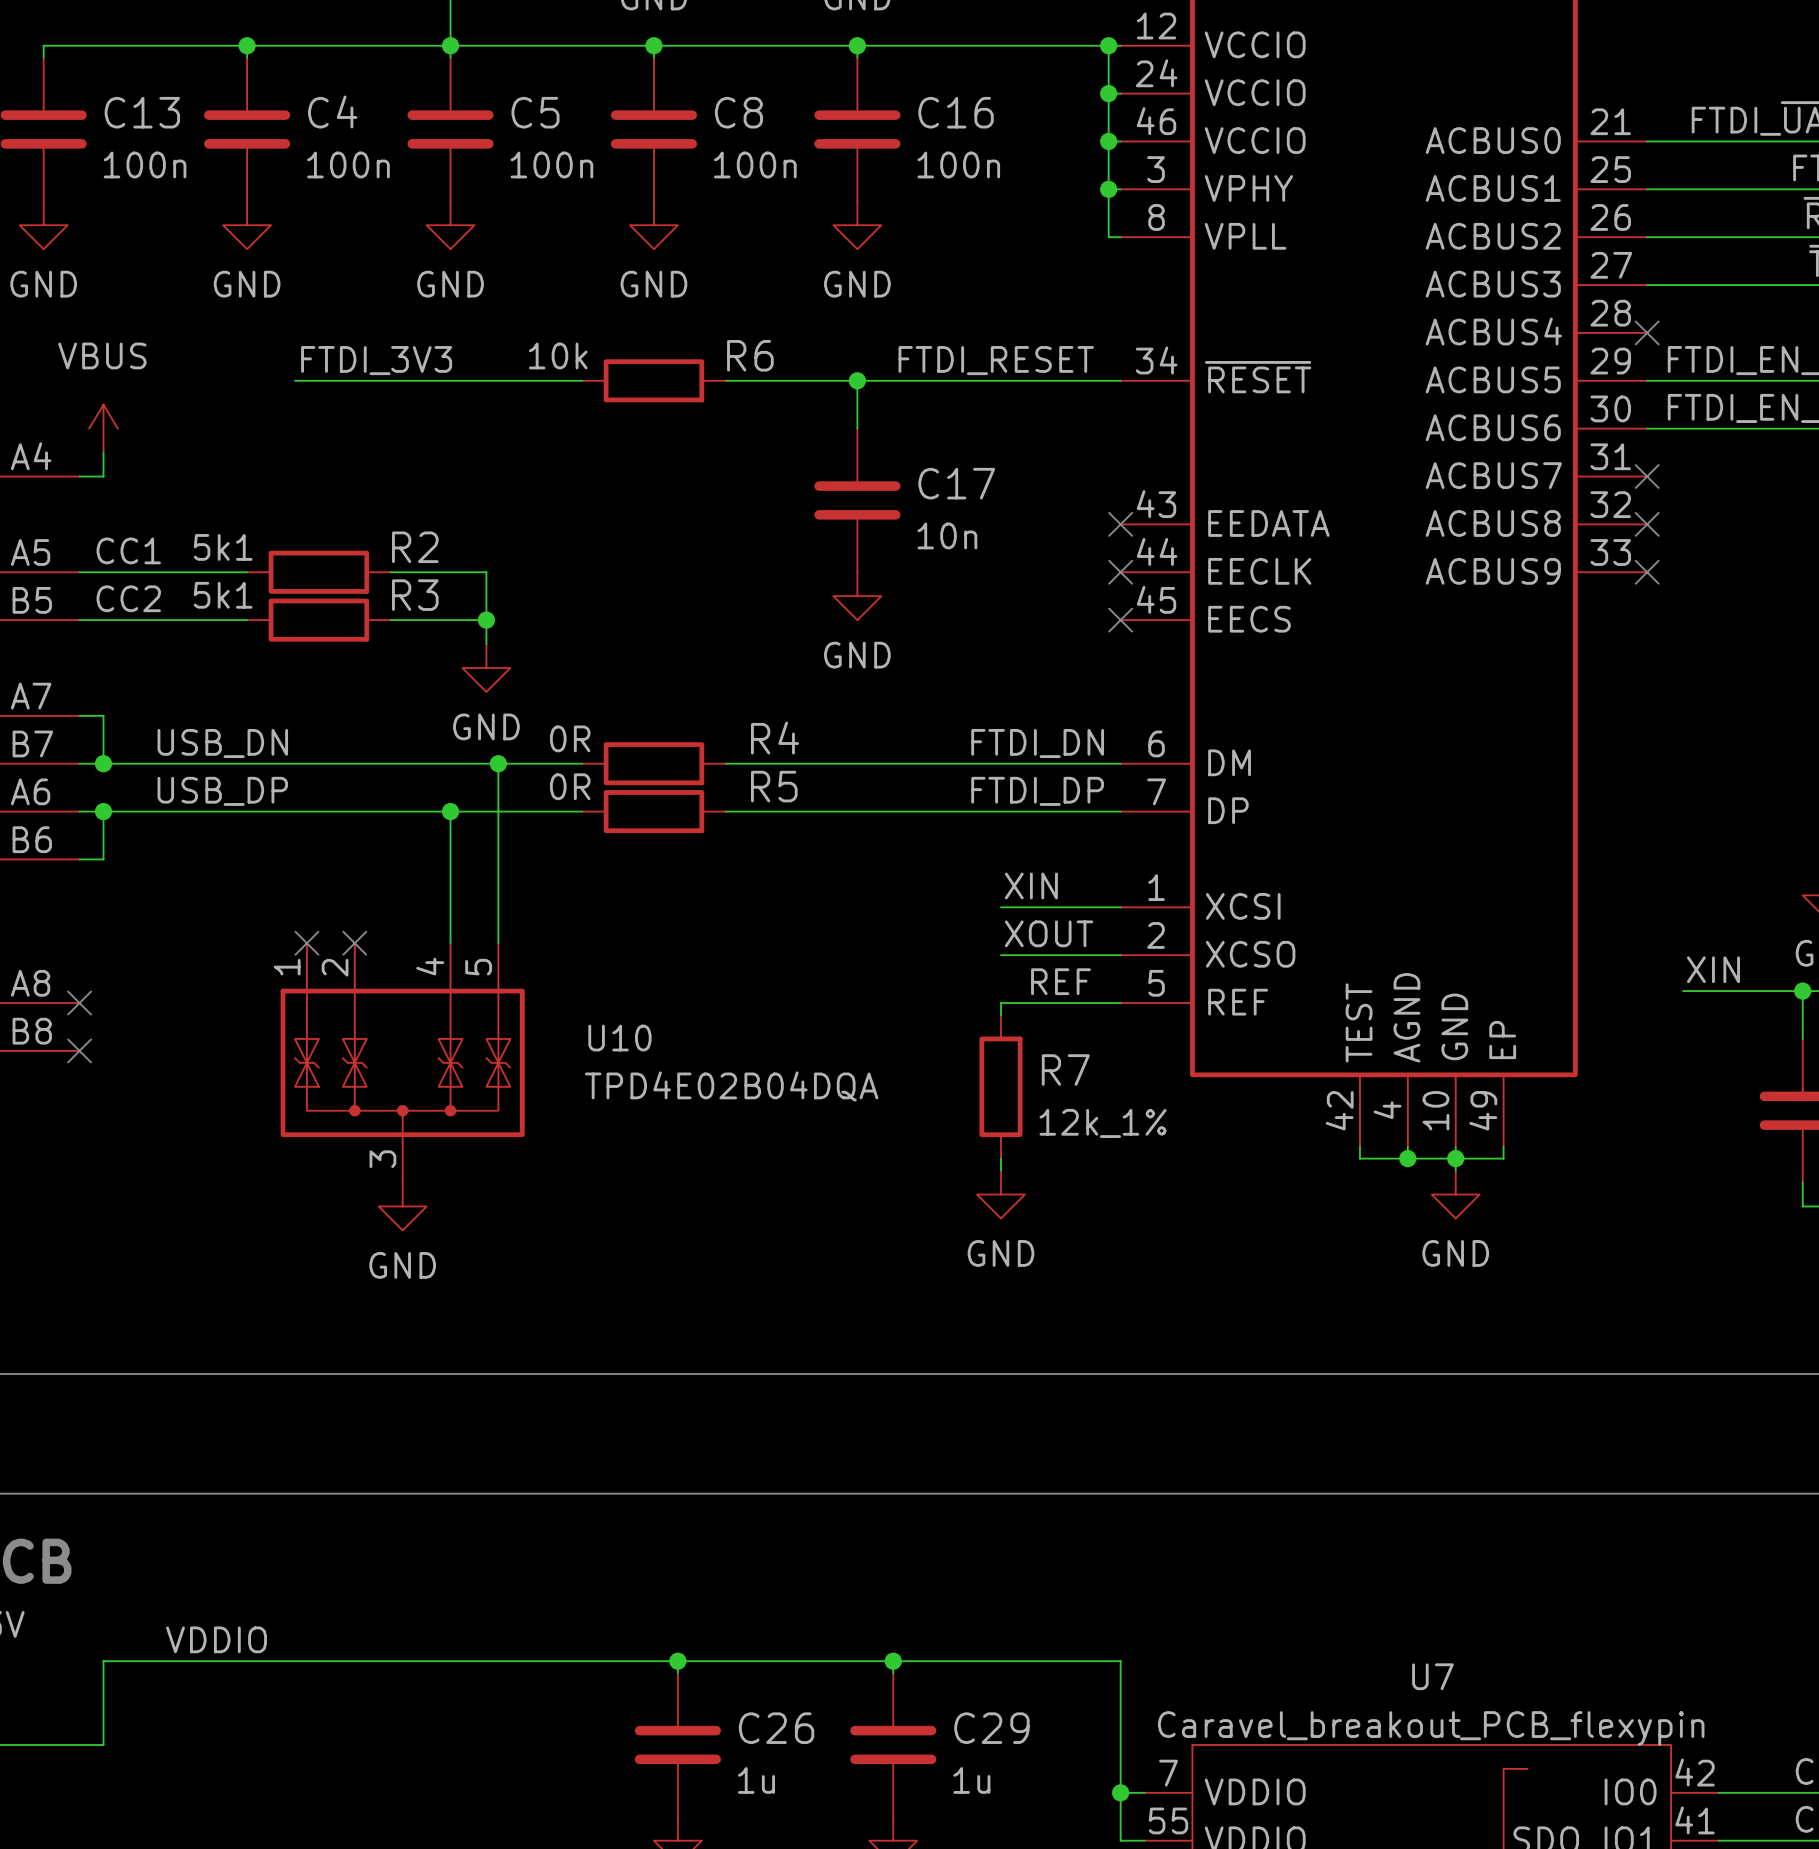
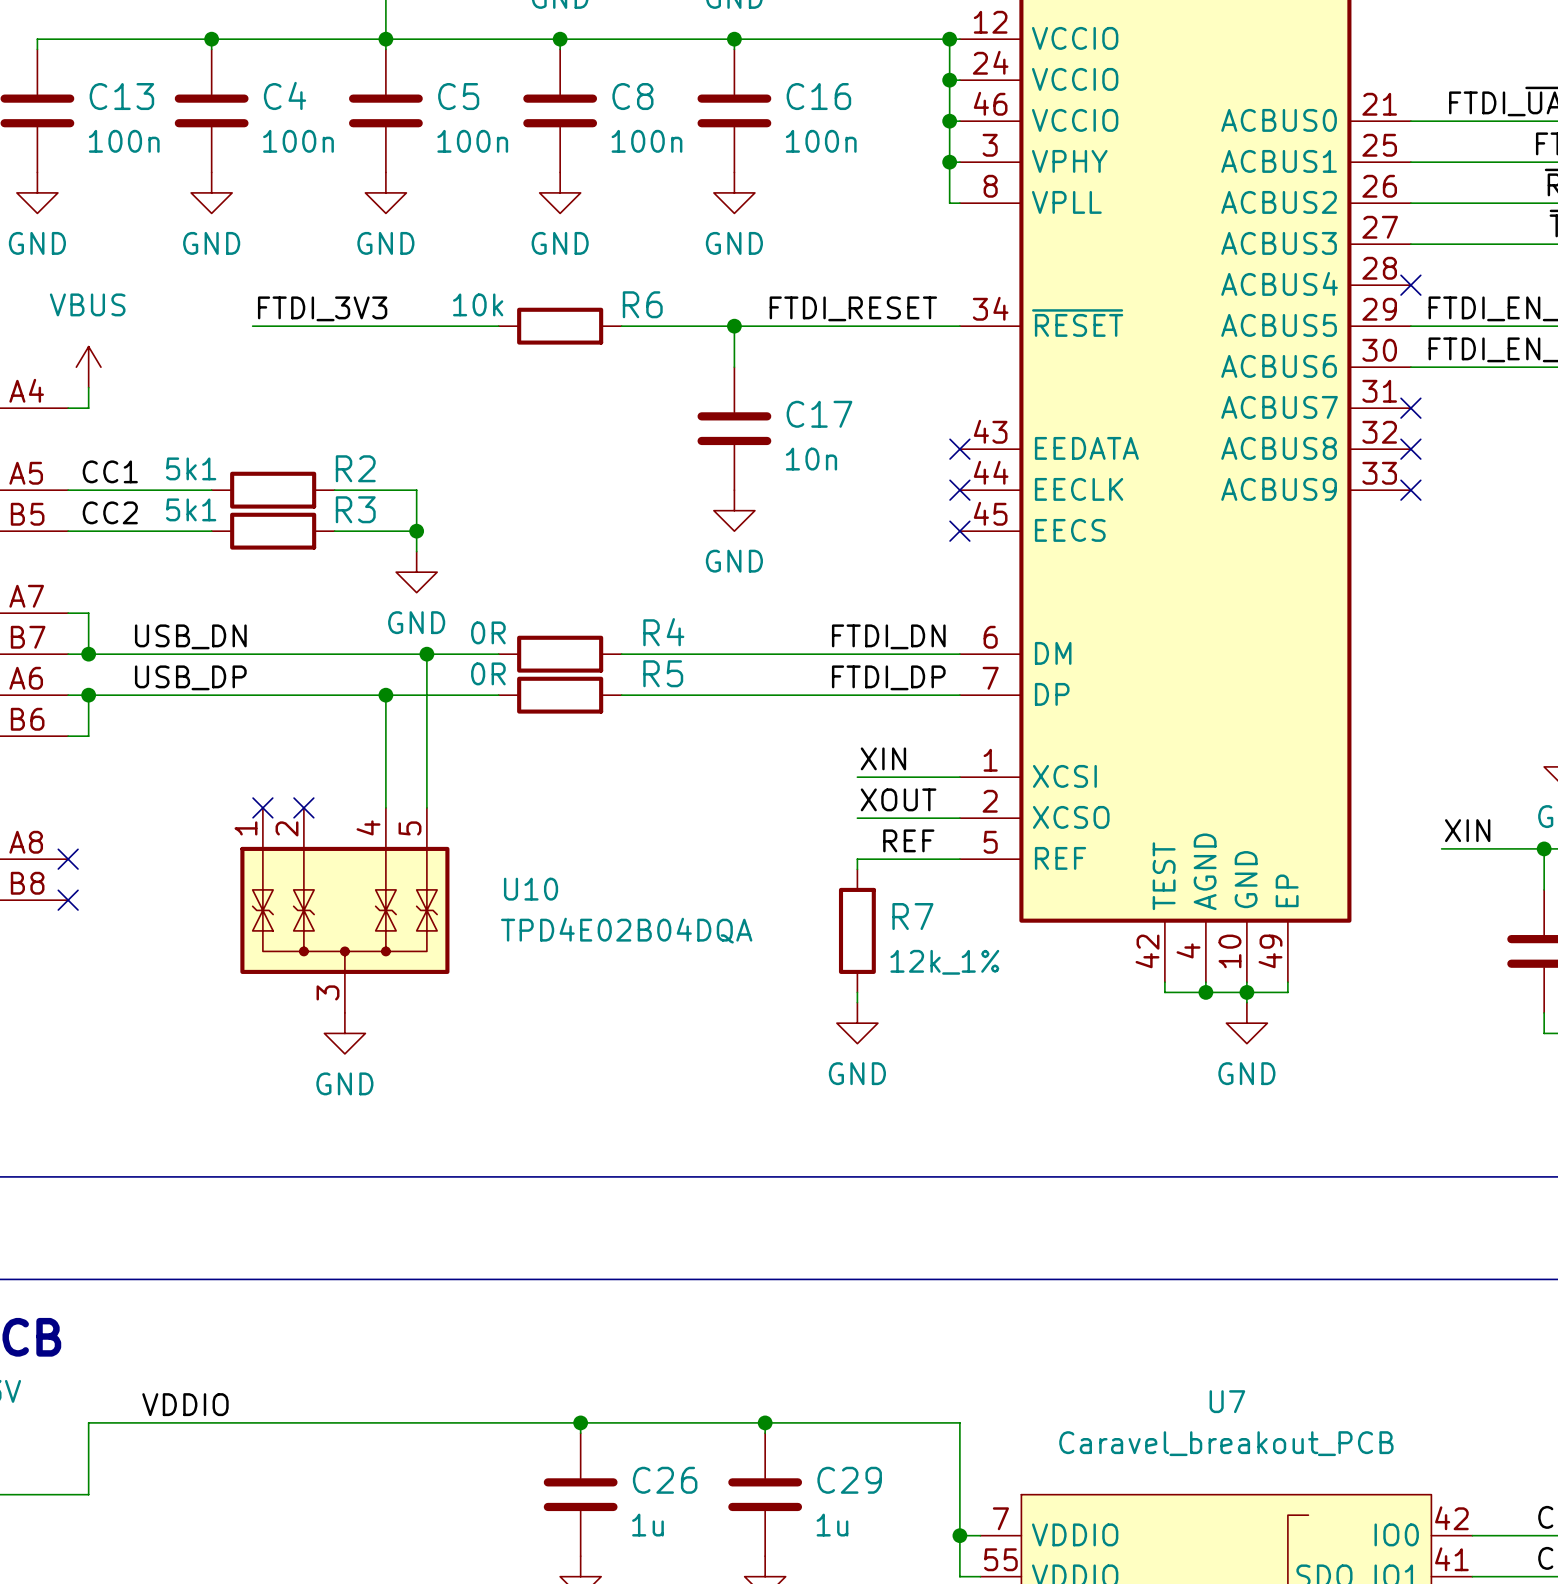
U7 name position: U7 (1432, 1676) -> U7 (1227, 1401)
U7 value: Caravel_breakout_PCB_flexypin (1431, 1728) -> Caravel_breakout_PCB (1226, 1443)

